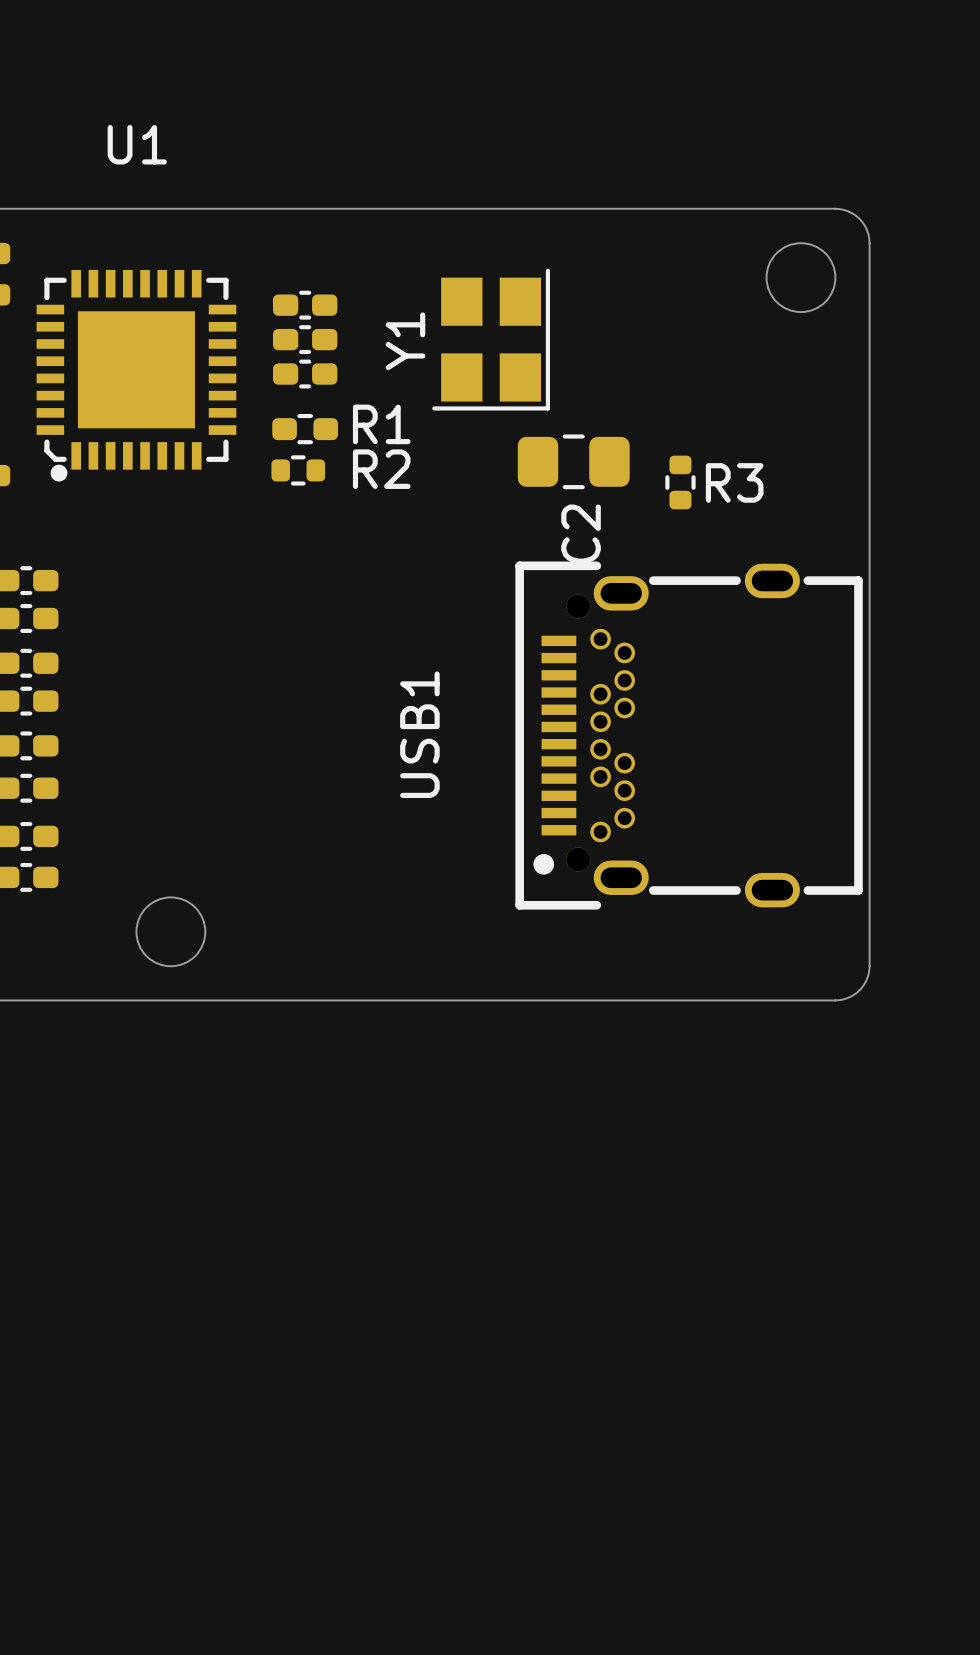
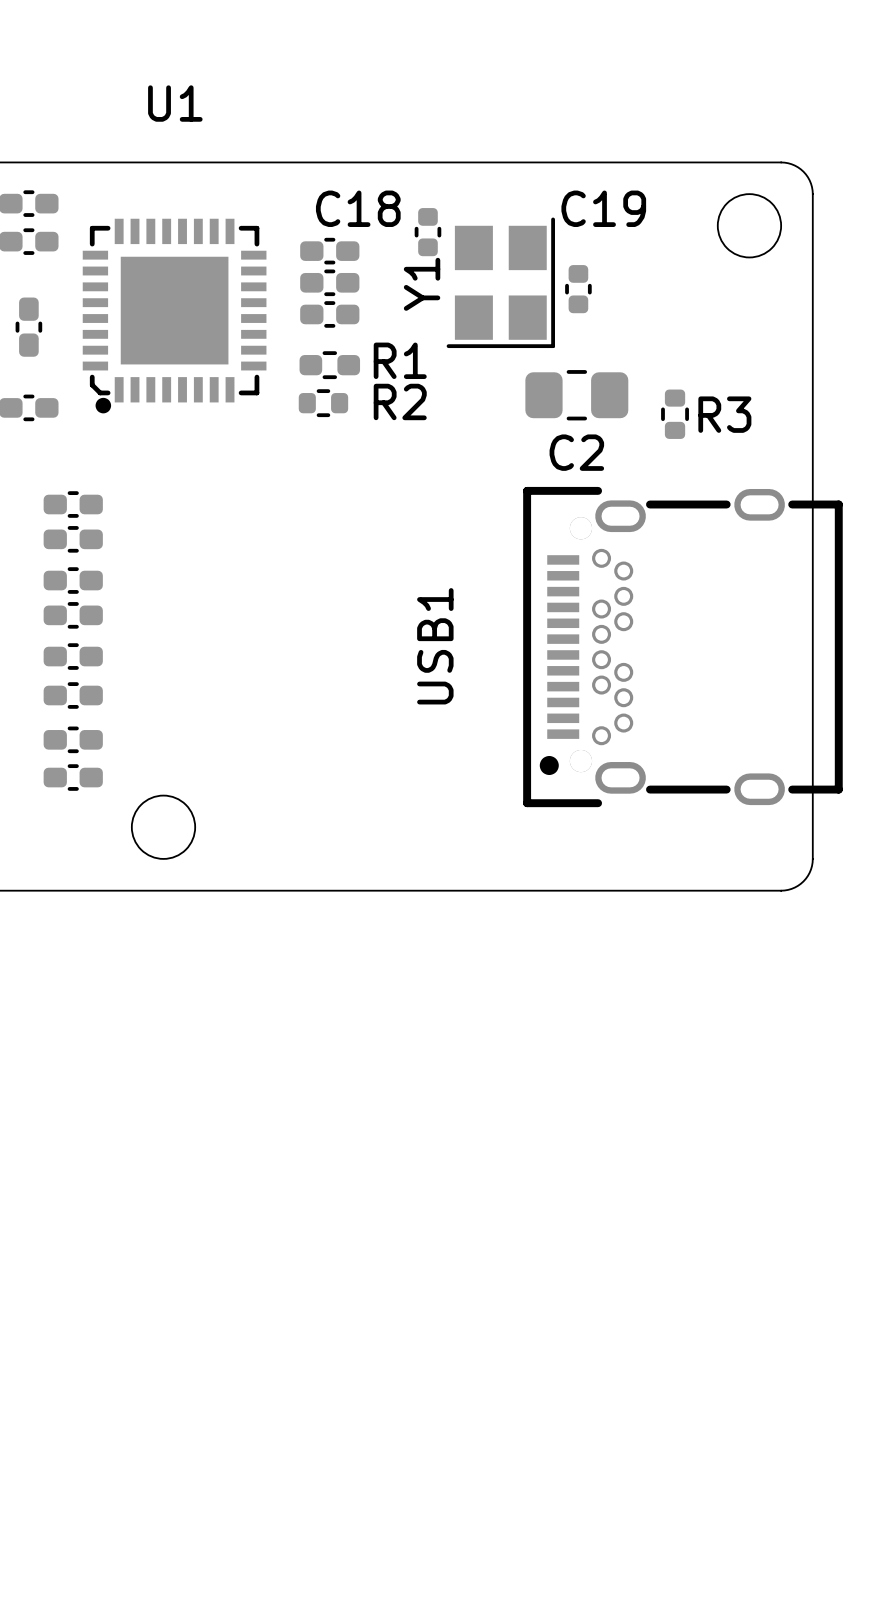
board edge: (795, 208) (835, 208) -> (781, 162) (791, 164) (803, 171) (811, 183) (812, 194) (812, 859)
board edge: (835, 208) (848, 211) (859, 218) (866, 230) (869, 243) (869, 966) (864, 984) (850, 997) (839, 1000) (795, 1000) -> (812, 859) (811, 869) (803, 881) (794, 887) (781, 890)
round board edge position: (800, 277) -> (749, 225)
C18: none -> (427, 232)
C19: none -> (578, 289)
C2 name rotation: 0° (581, 534) -> 90° clockwise (576, 452)
round board edge position: (170, 931) -> (163, 827)

